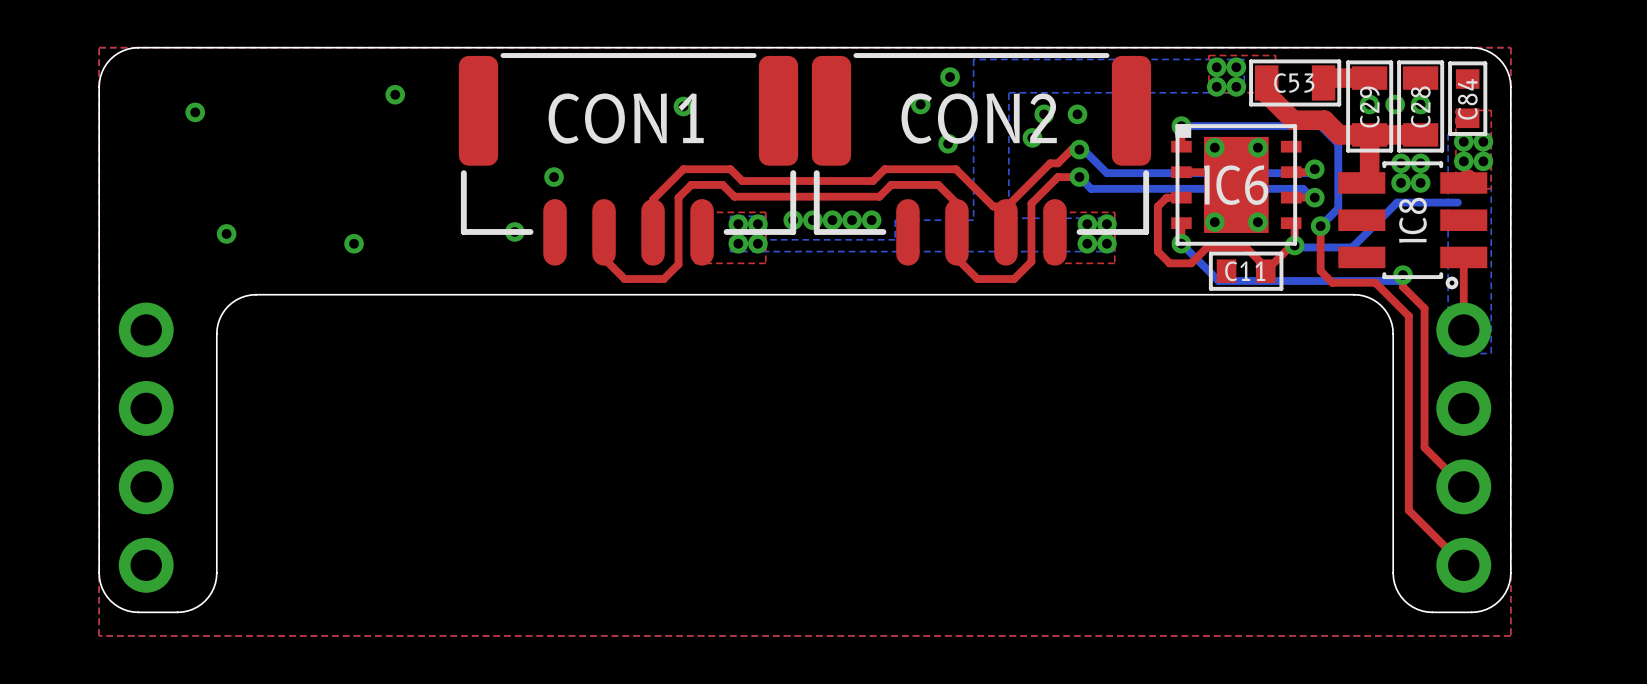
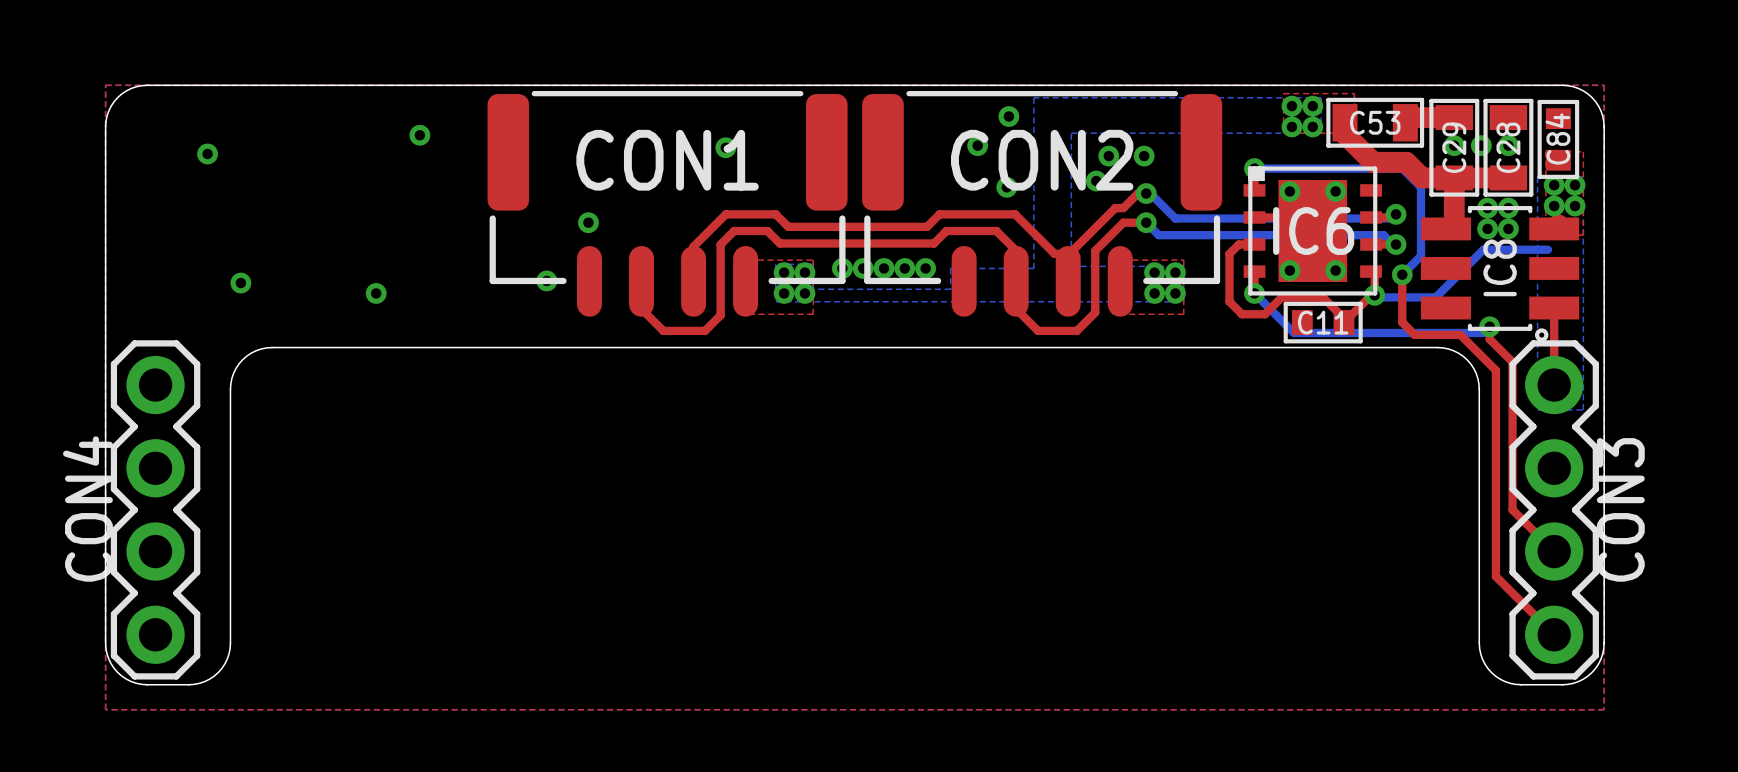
CON4 side: bottom (146, 447) -> top (155, 509)
CON3 side: bottom (1463, 447) -> top (1554, 509)

